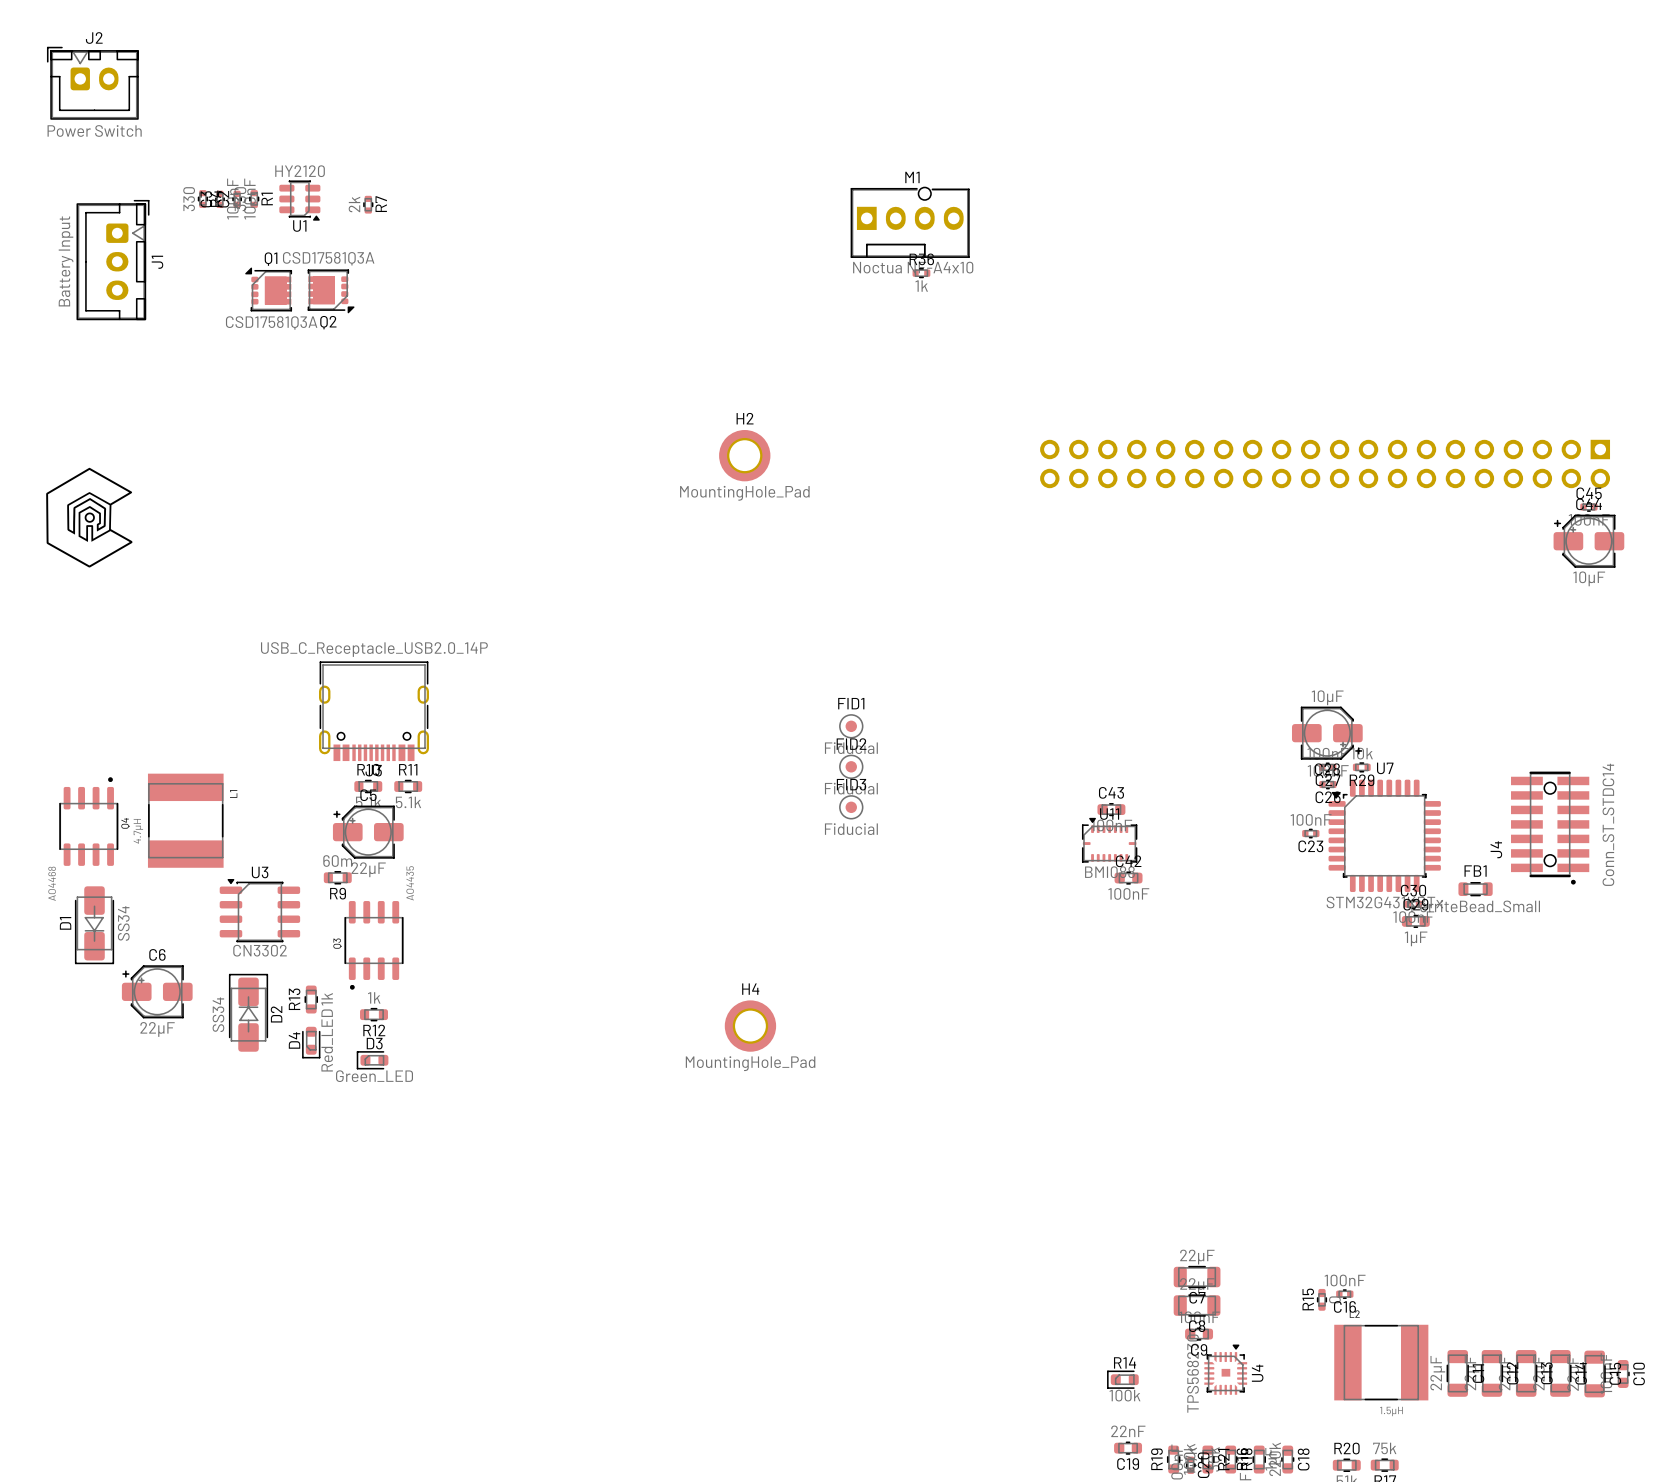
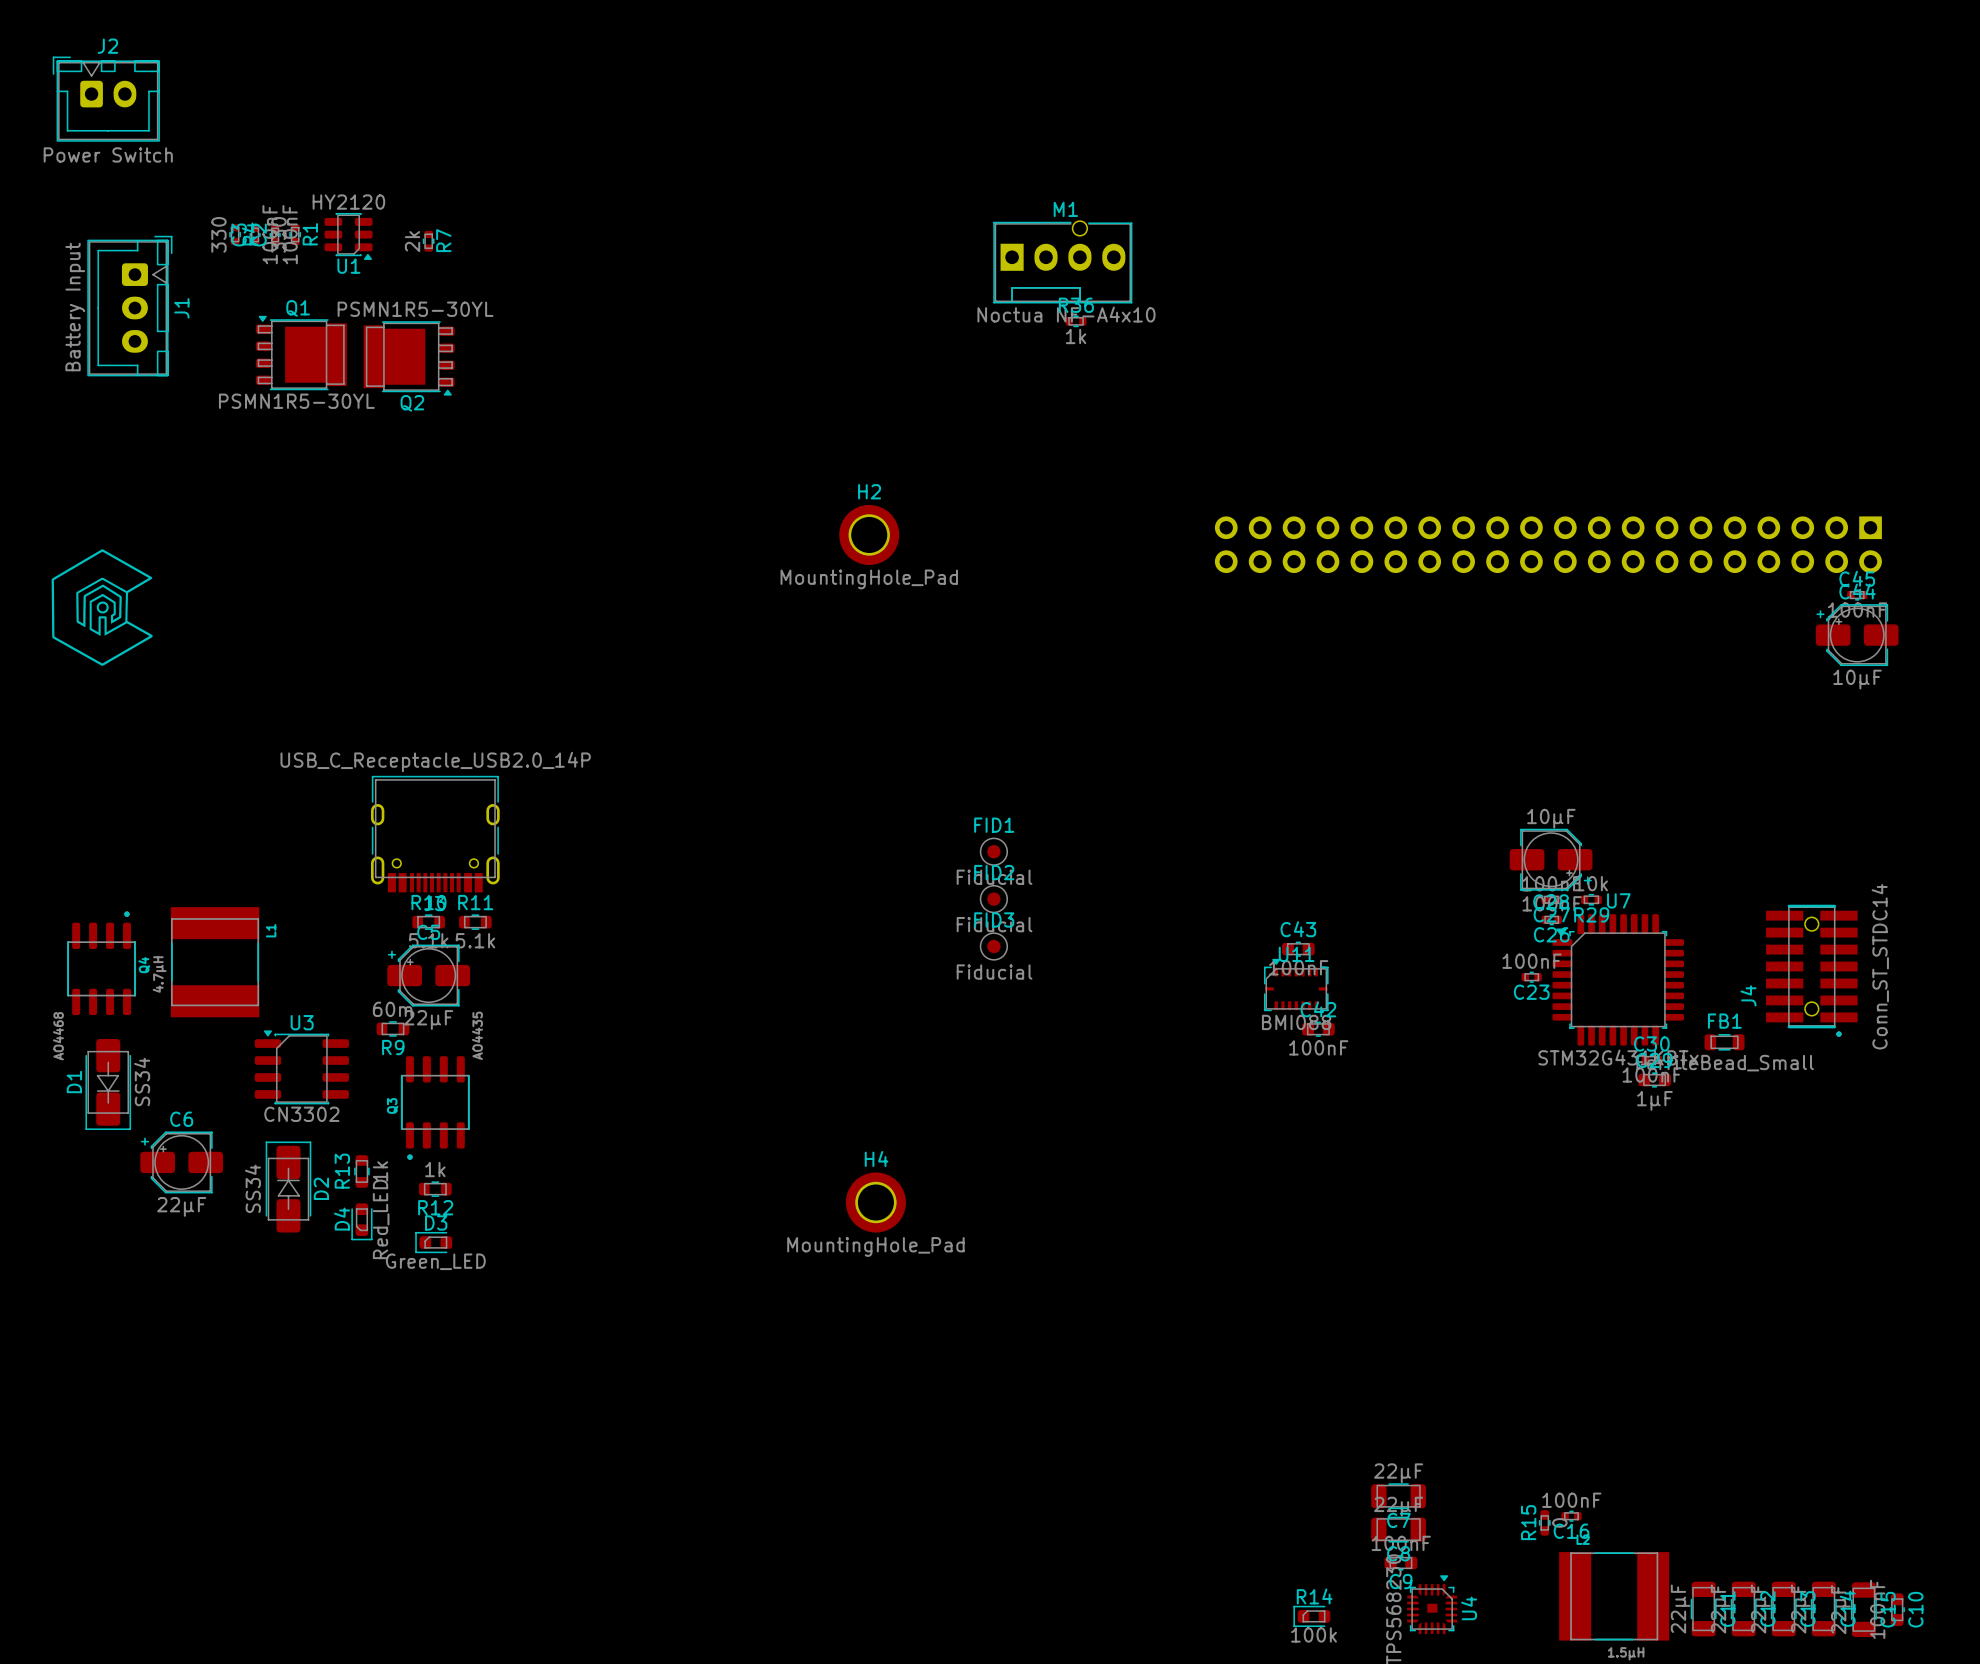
Q2 value: CSD17581Q3A (328, 258) -> PSMN1R5-30YL (415, 309)
Q1 footprint: [245, 267, 292, 312] -> [255, 315, 347, 391]
Q2 footprint: [307, 269, 355, 314] -> [363, 321, 455, 396]
Q1 value: CSD17581Q3A (271, 322) -> PSMN1R5-30YL (296, 401)

